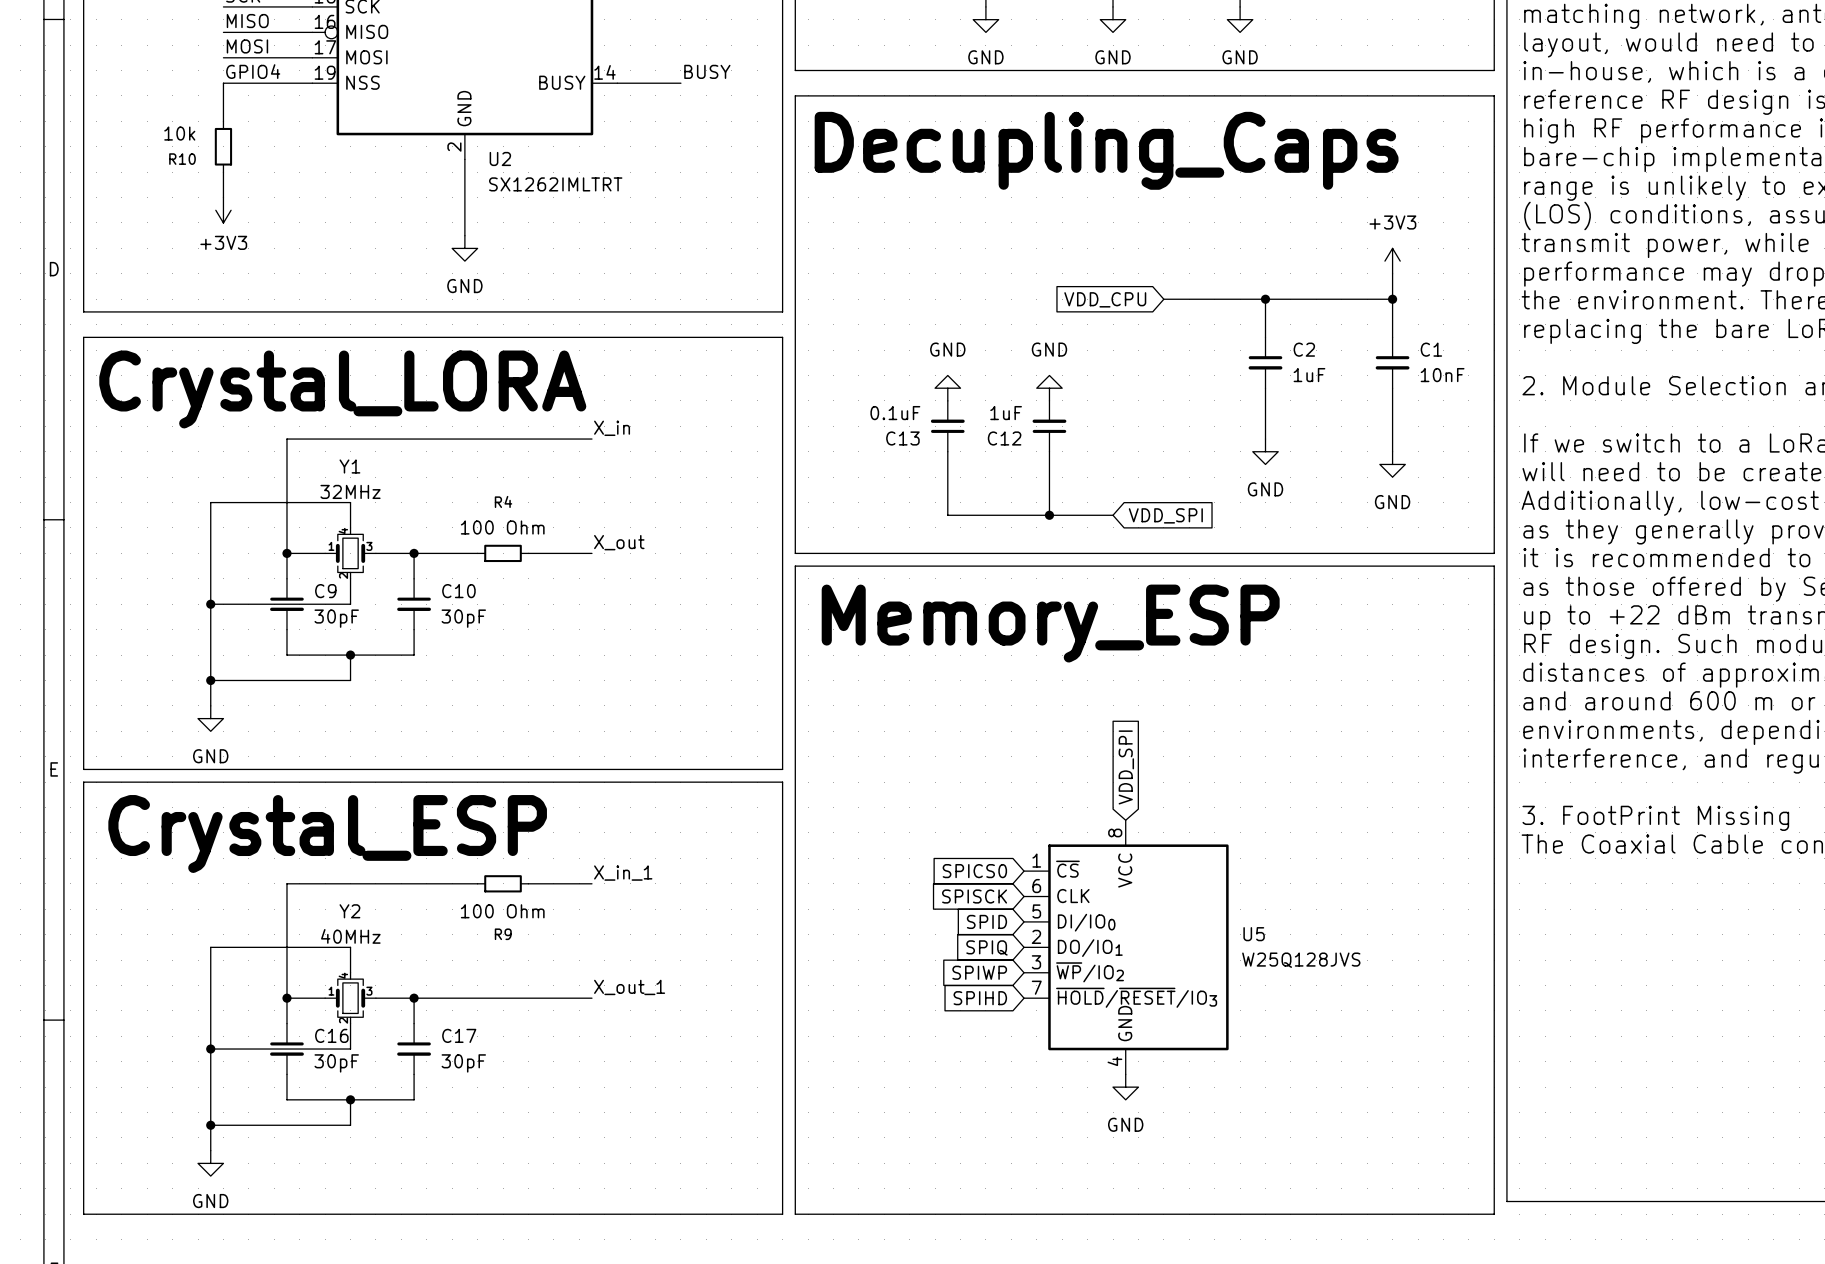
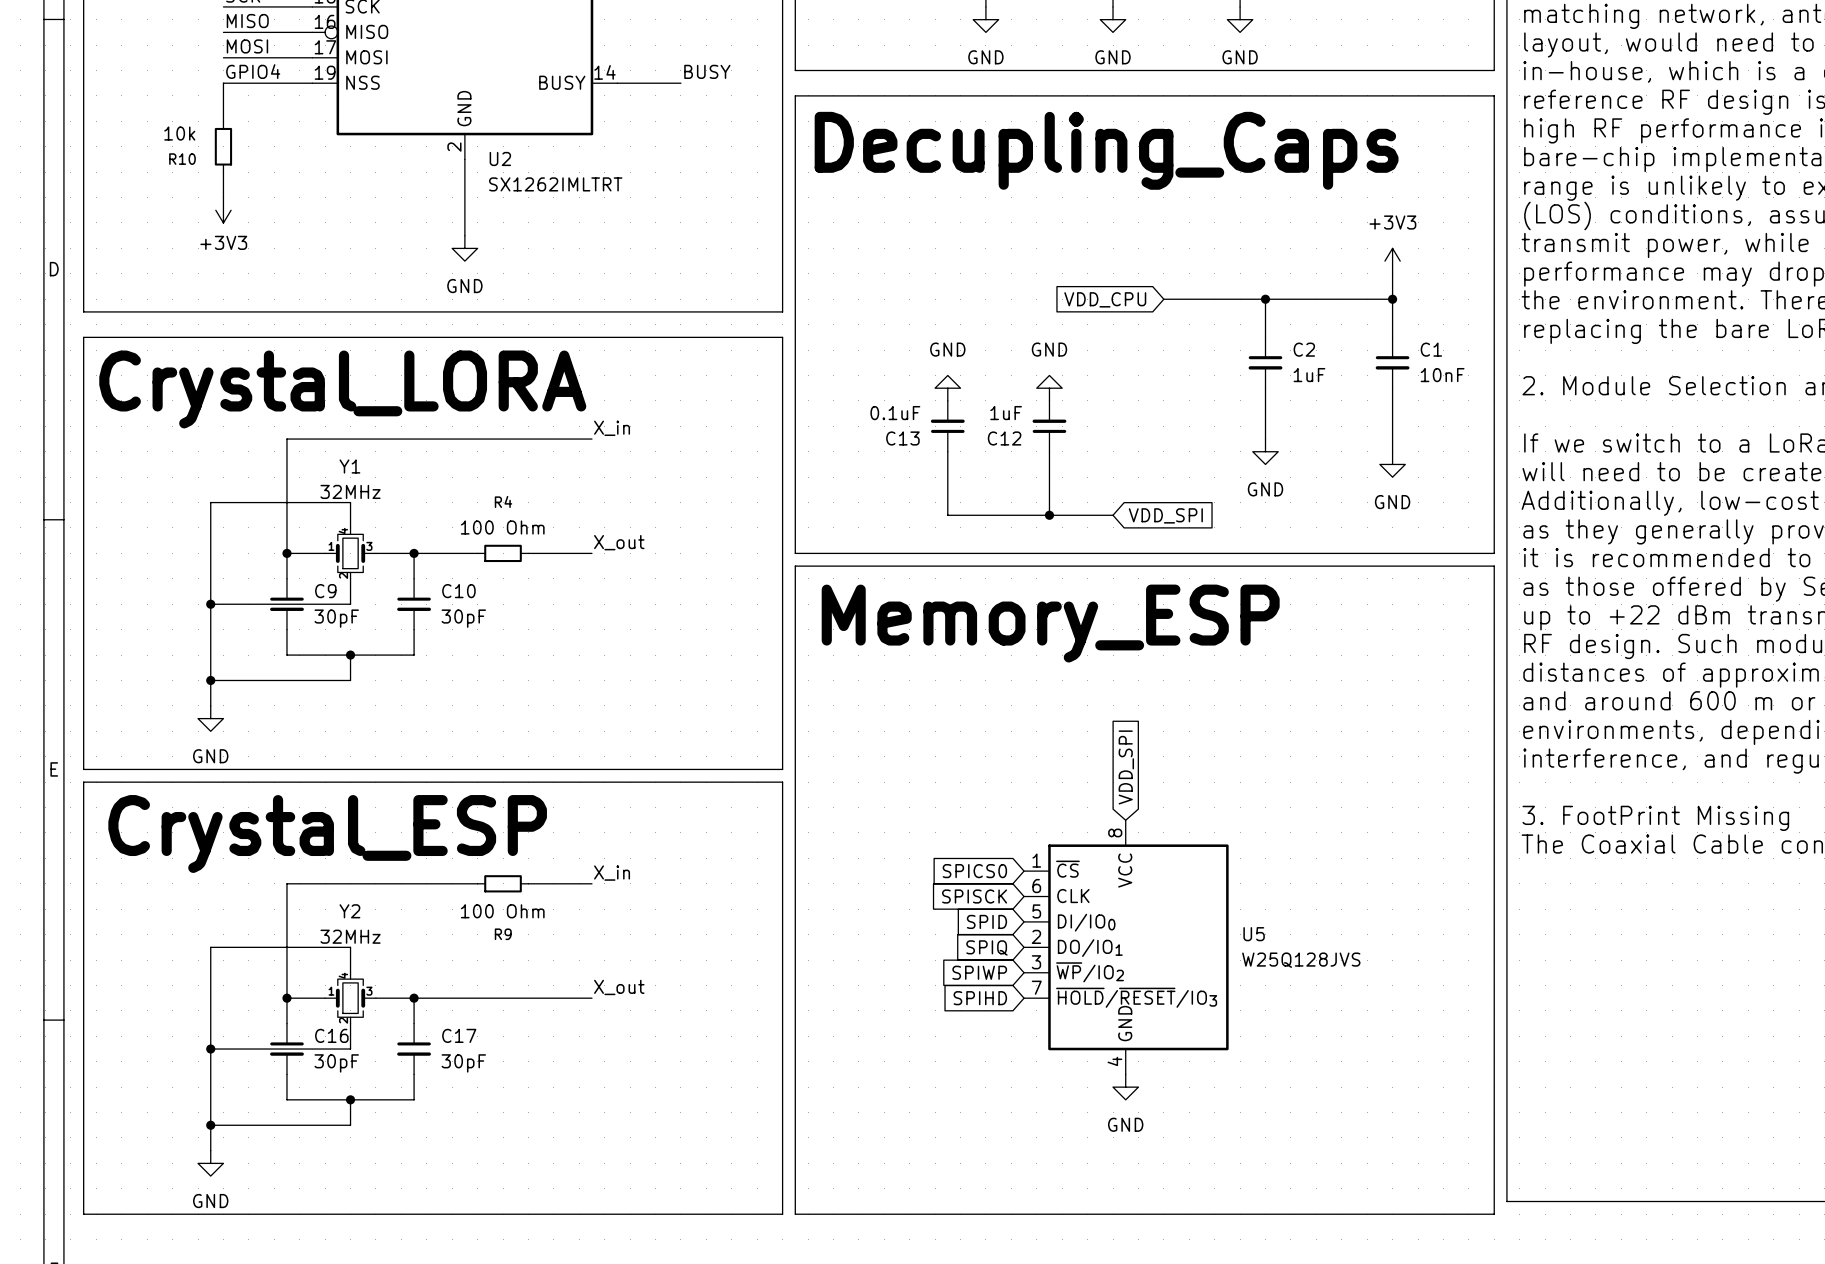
label: X_in_1 (623, 873) -> X_in (612, 873)
Y2 value: 40MHz (350, 936) -> 32MHz (350, 936)
label: X_out_1 (629, 987) -> X_out (619, 987)

